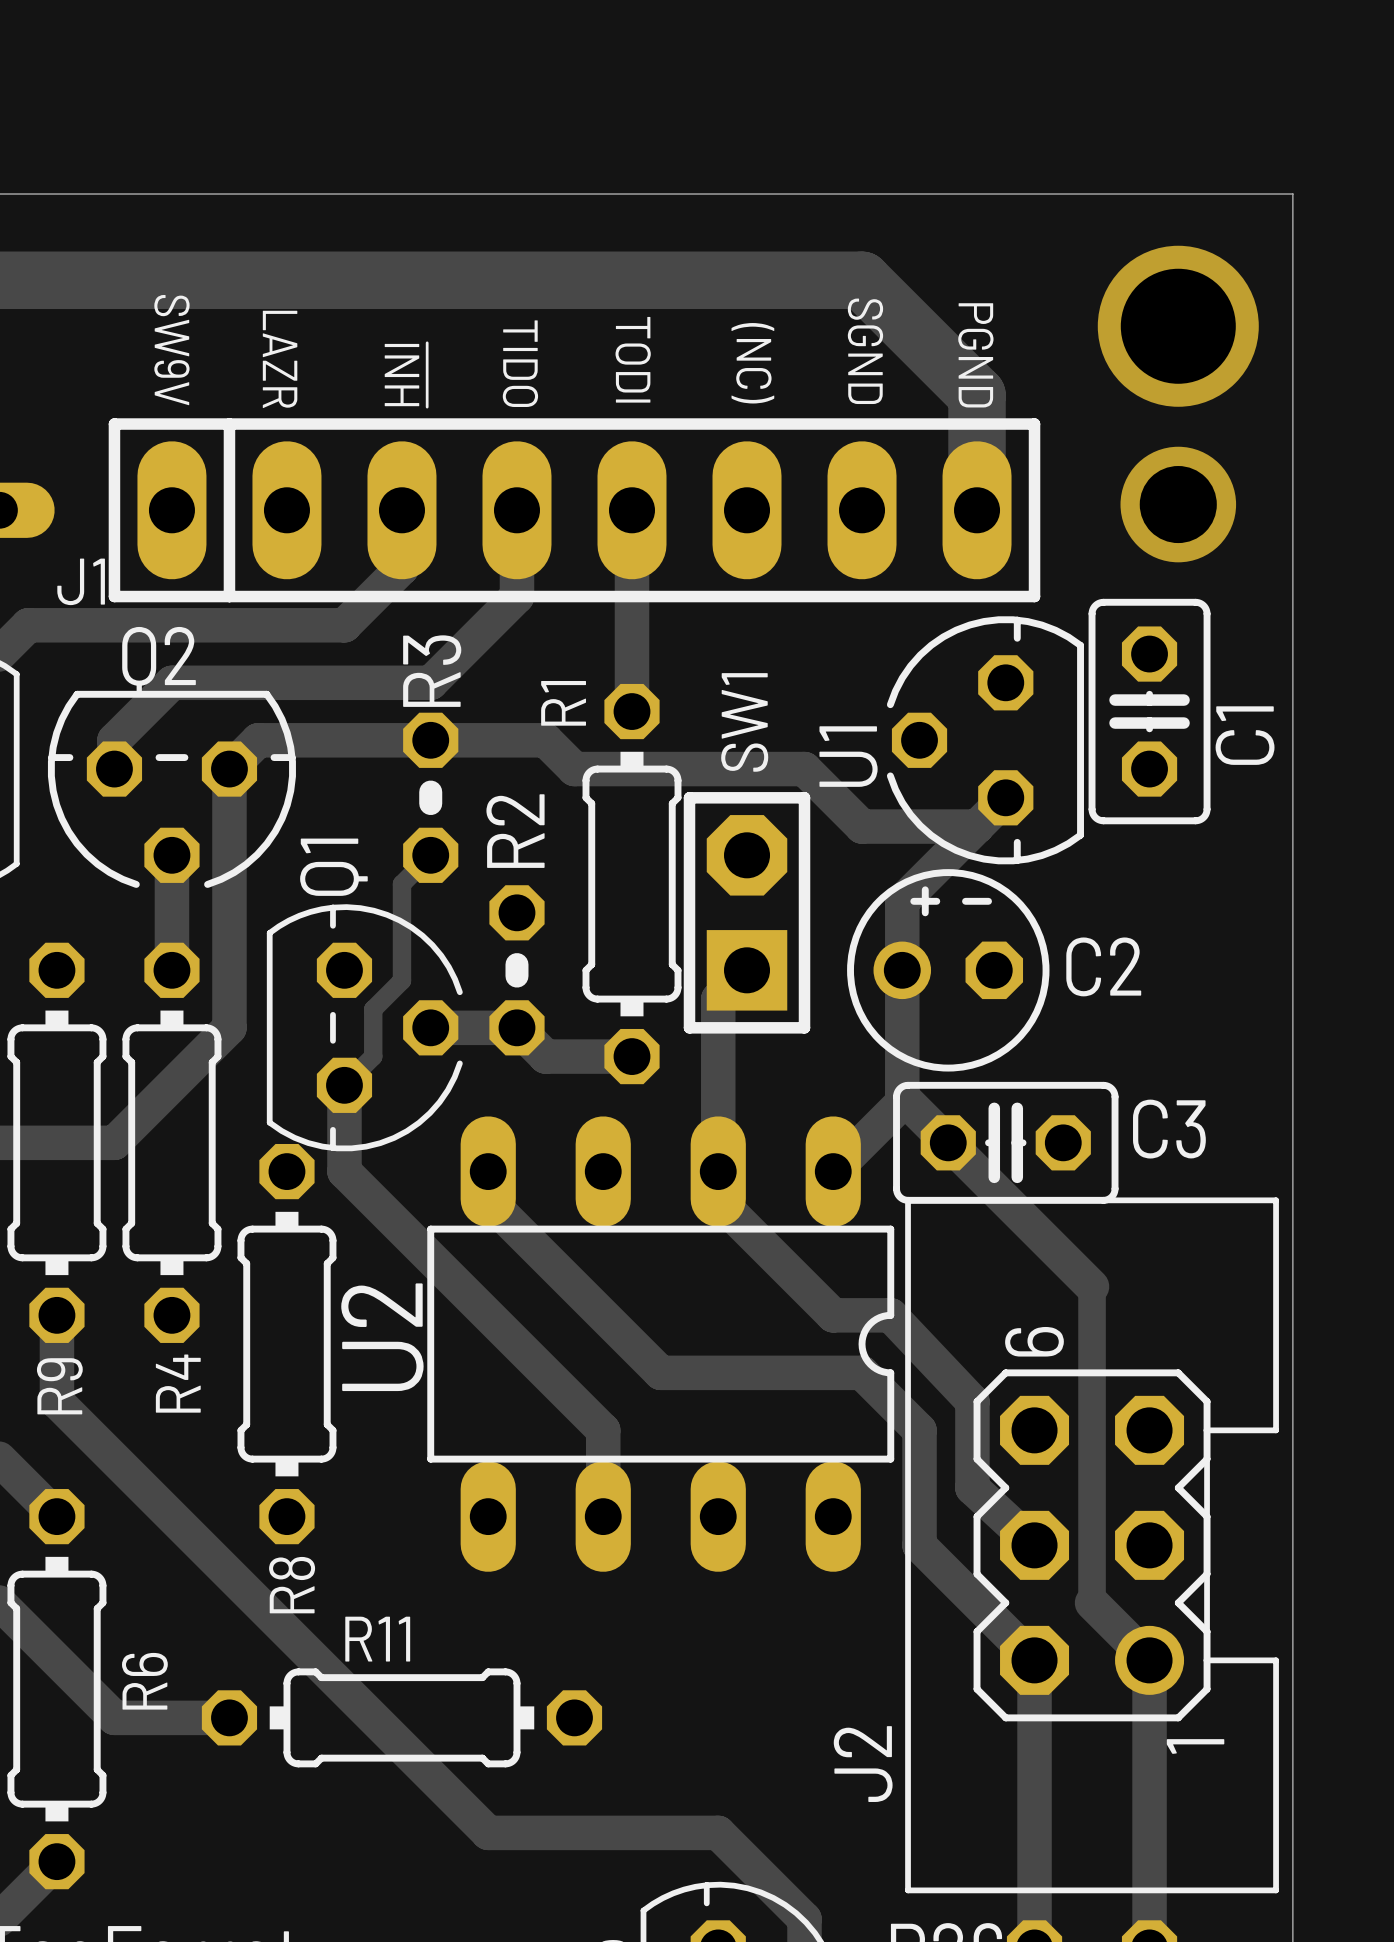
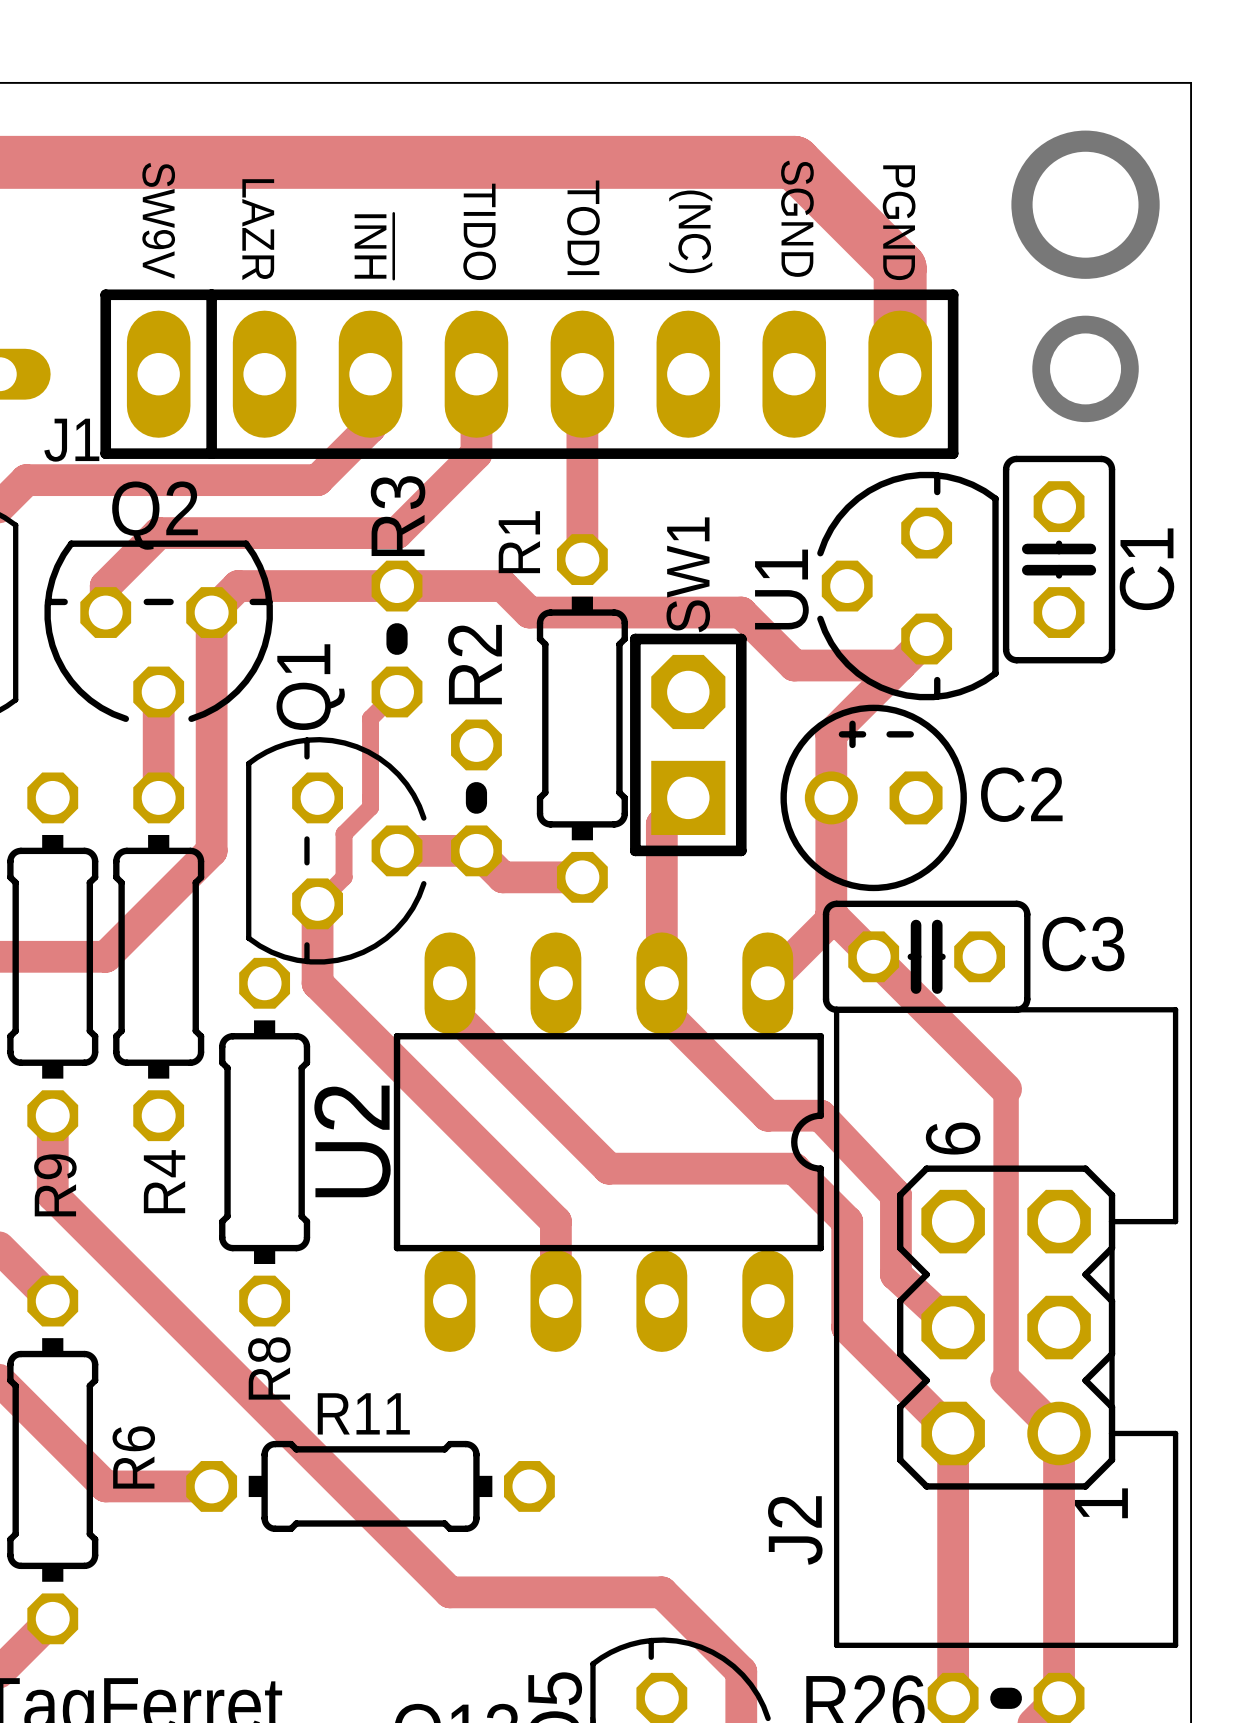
SW1 name position: SW1 (744, 722) -> SW1 (688, 574)

